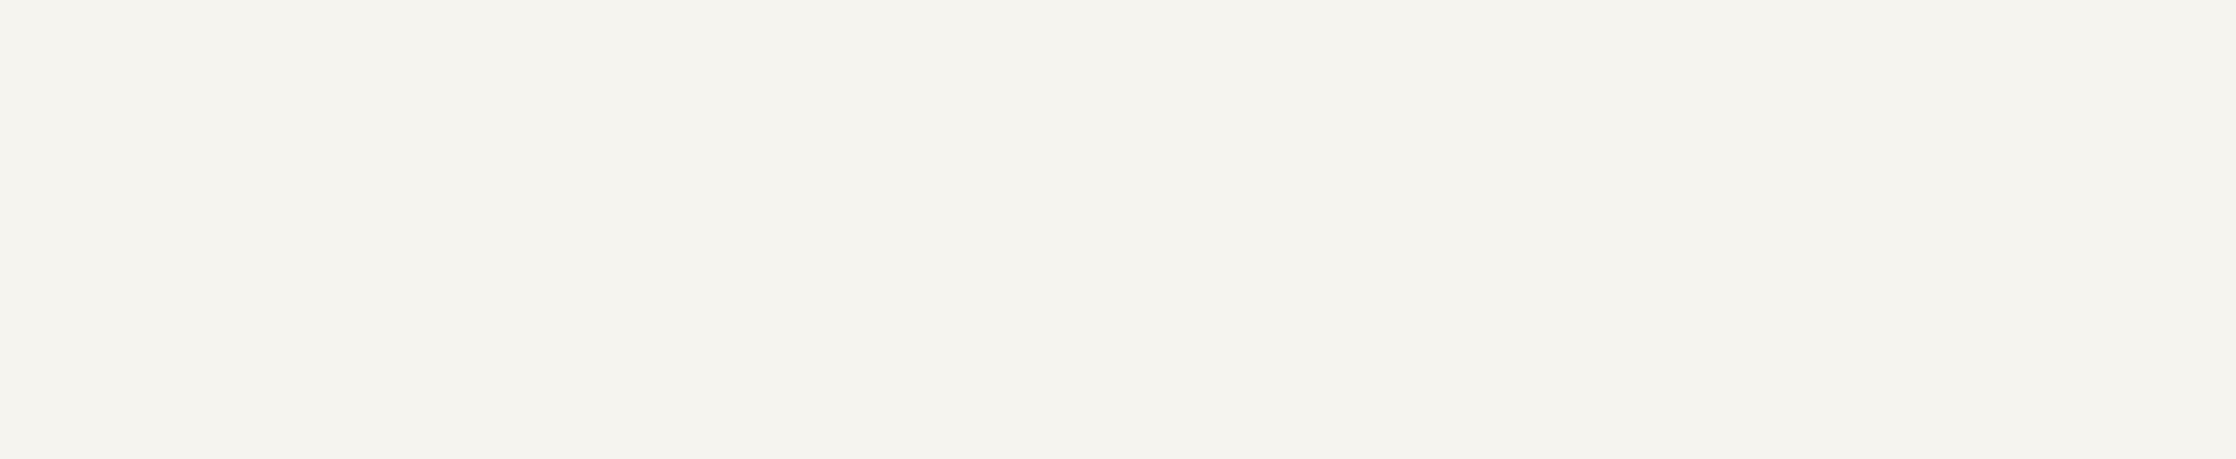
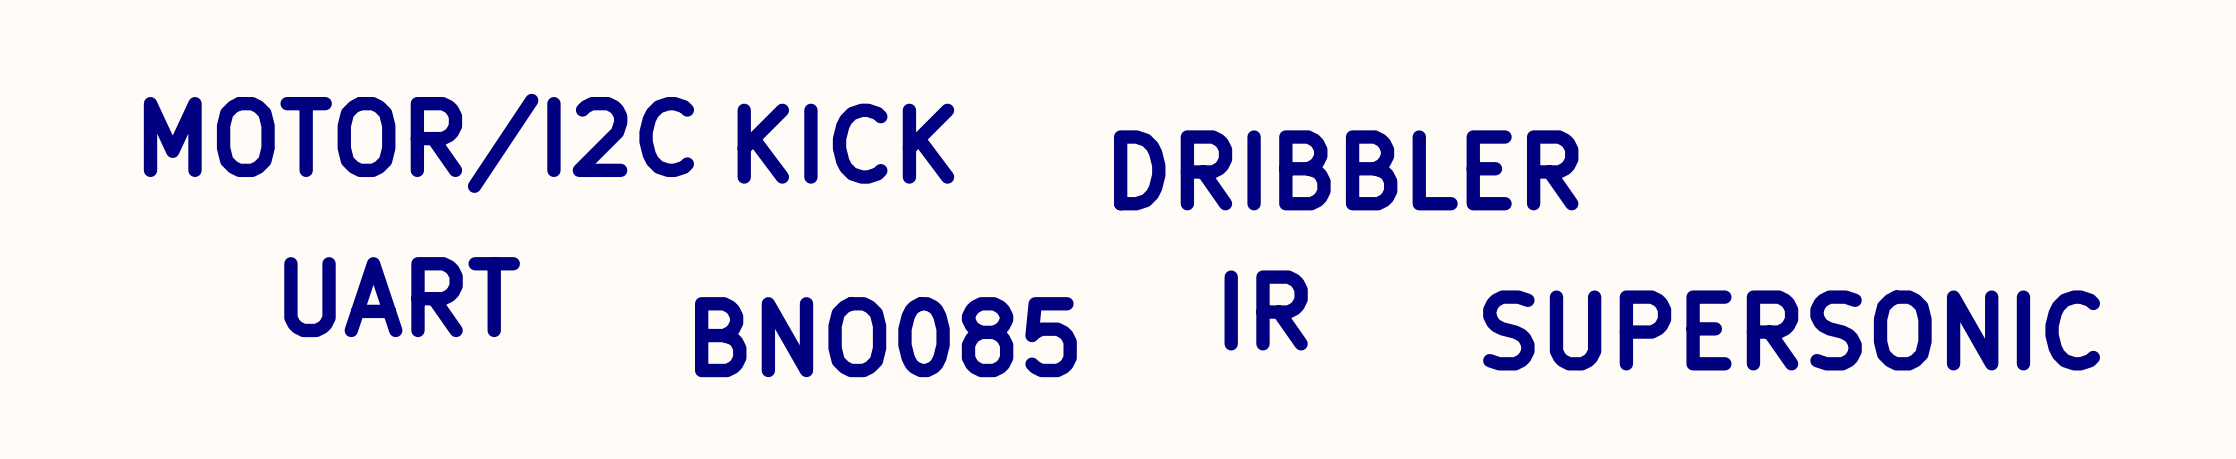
text: none -> MOTOR/I2C (418, 143)
text: none -> KICK (845, 143)
text: none -> DRIBBLER (1346, 170)
text: none -> UART (402, 297)
text: none -> IR (1266, 310)
text: none -> SUPERSONIC (1791, 330)
text: none -> BNO085 (885, 337)

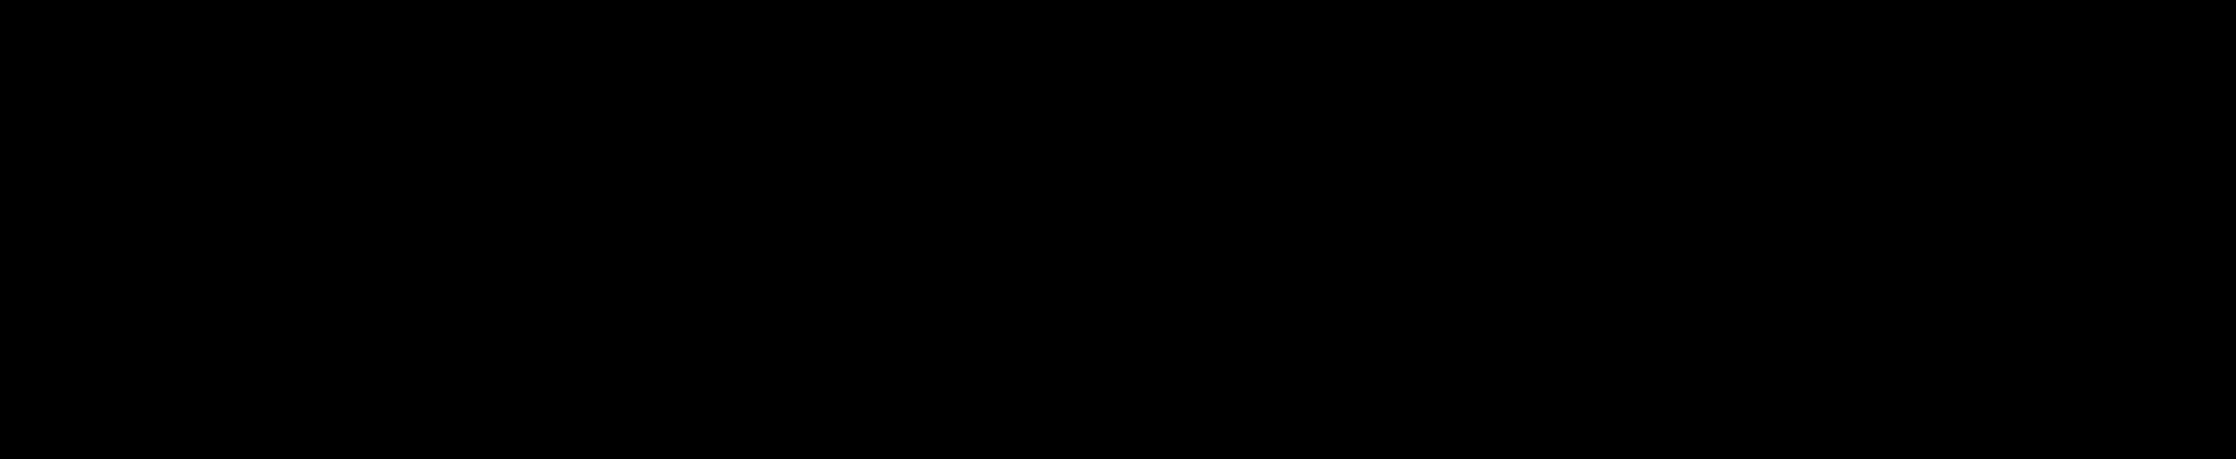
text: MOTOR/I2C (418, 143) -> none
text: KICK (845, 143) -> none
text: DRIBBLER (1346, 170) -> none
text: UART (402, 297) -> none
text: IR (1266, 310) -> none
text: SUPERSONIC (1791, 330) -> none
text: BNO085 (885, 337) -> none

